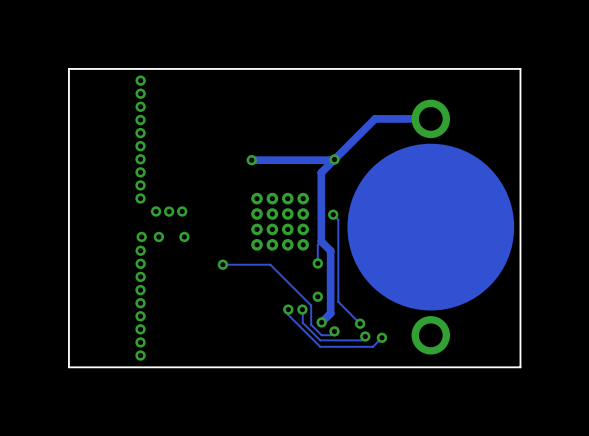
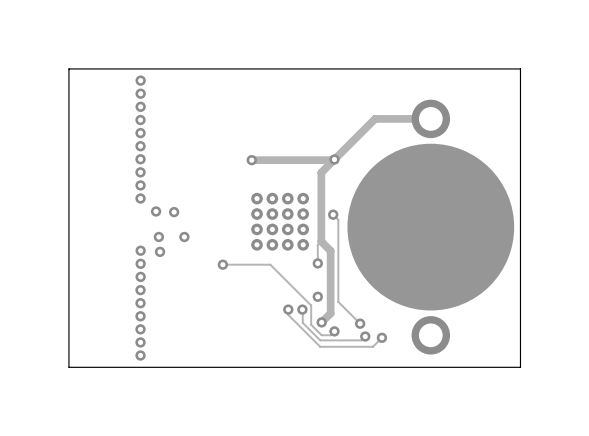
via: (169, 211) -> none
via: (182, 211) -> none
via: none -> (174, 212)
via: (141, 236) -> none
via: none -> (160, 251)

